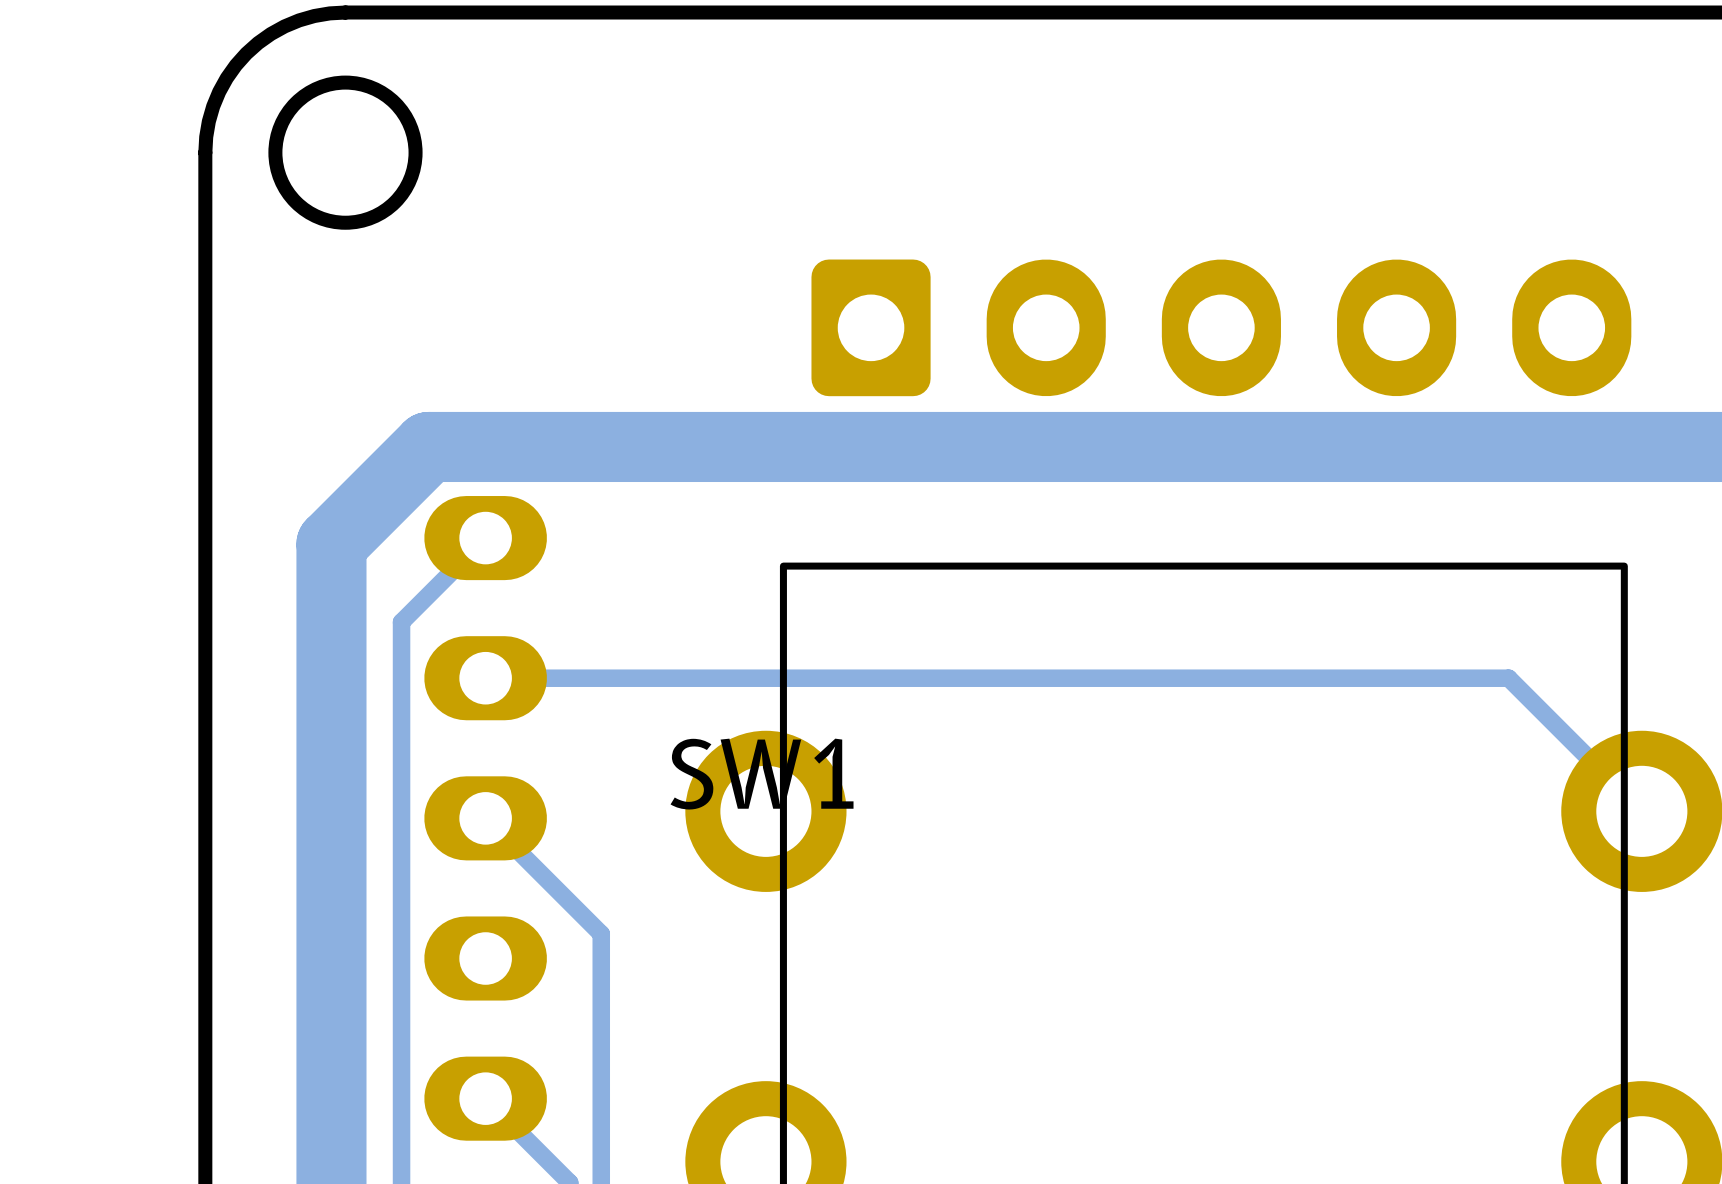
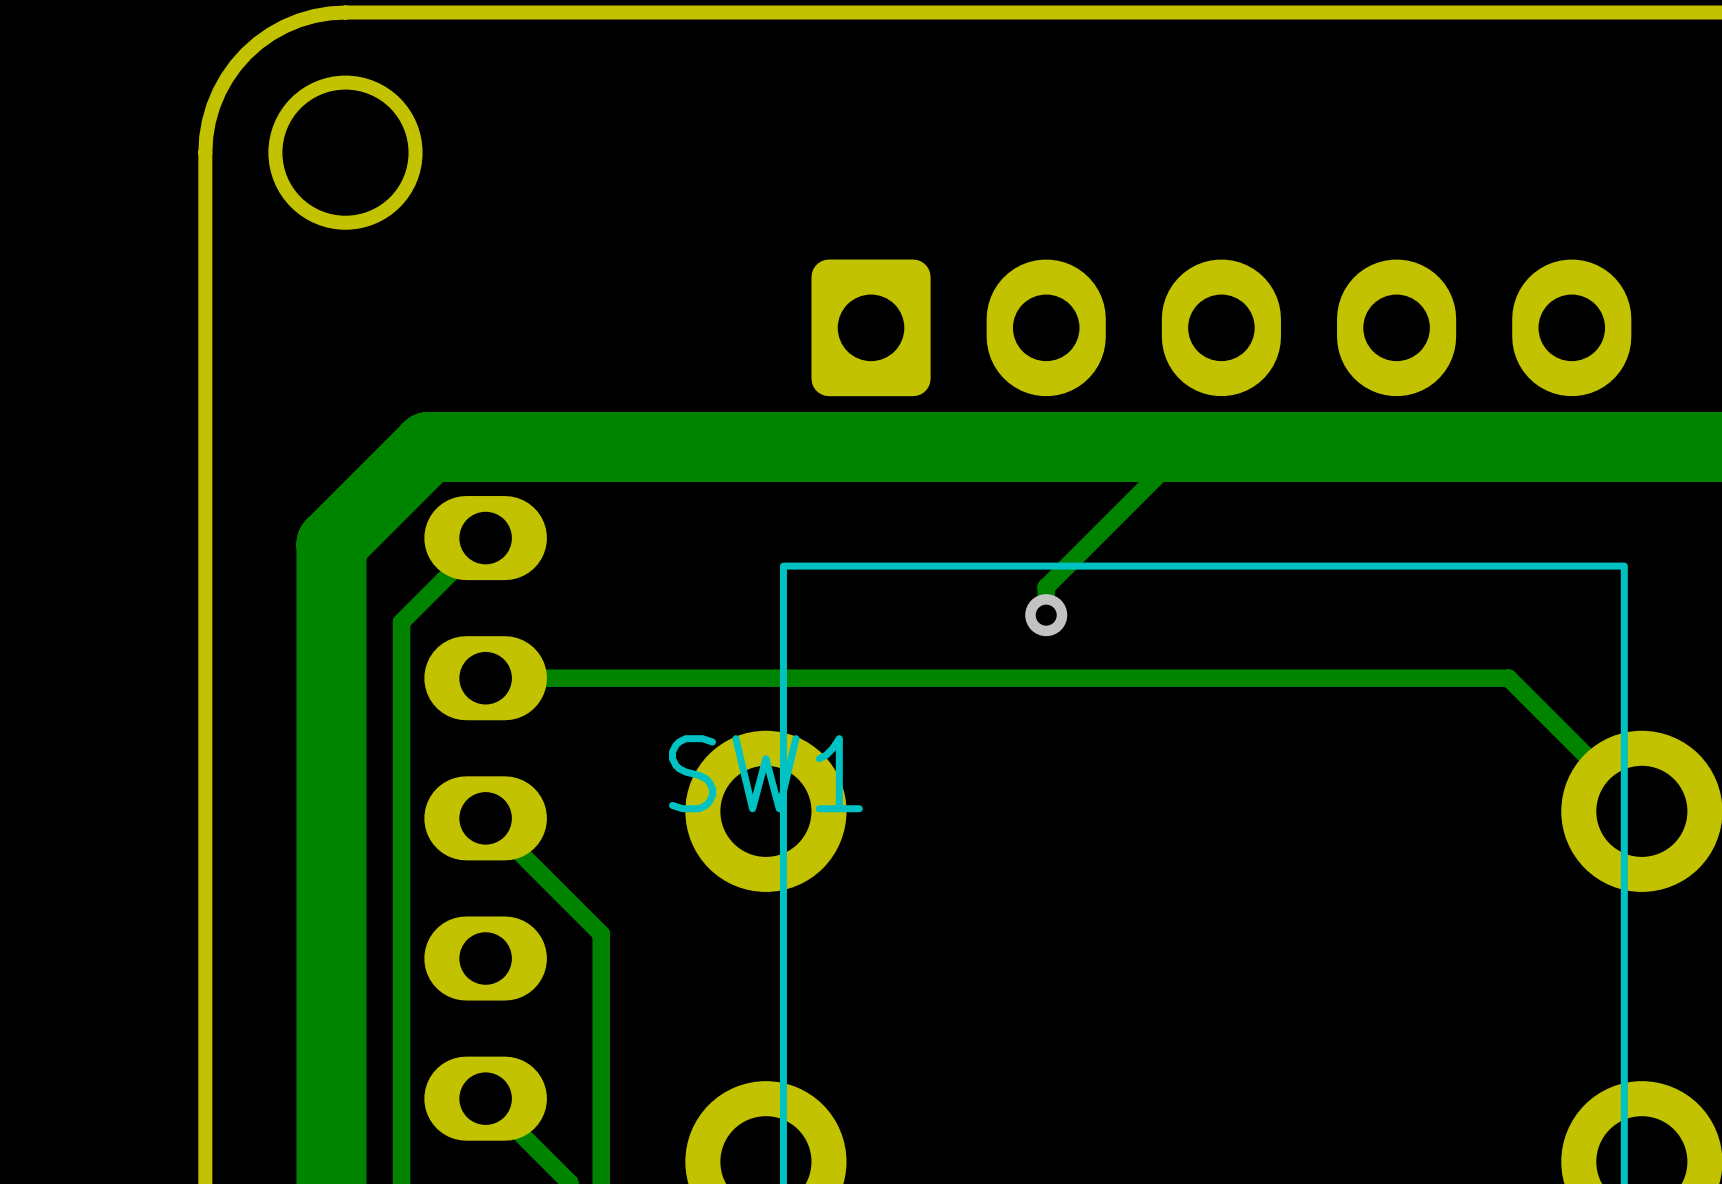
track: none -> (1186, 446) (1046, 587) (1046, 615)
via: none -> (1046, 615)

